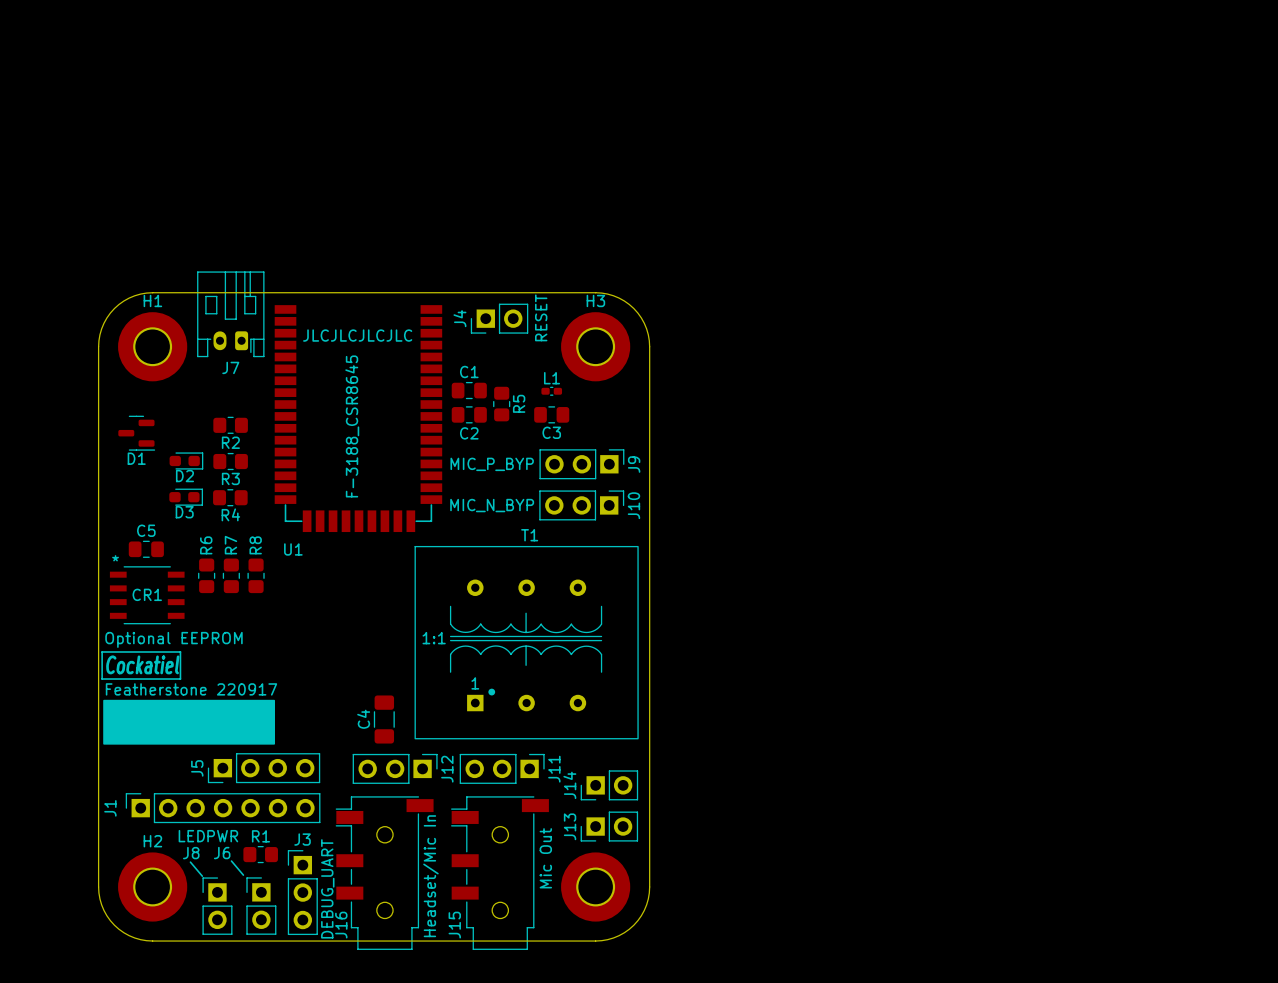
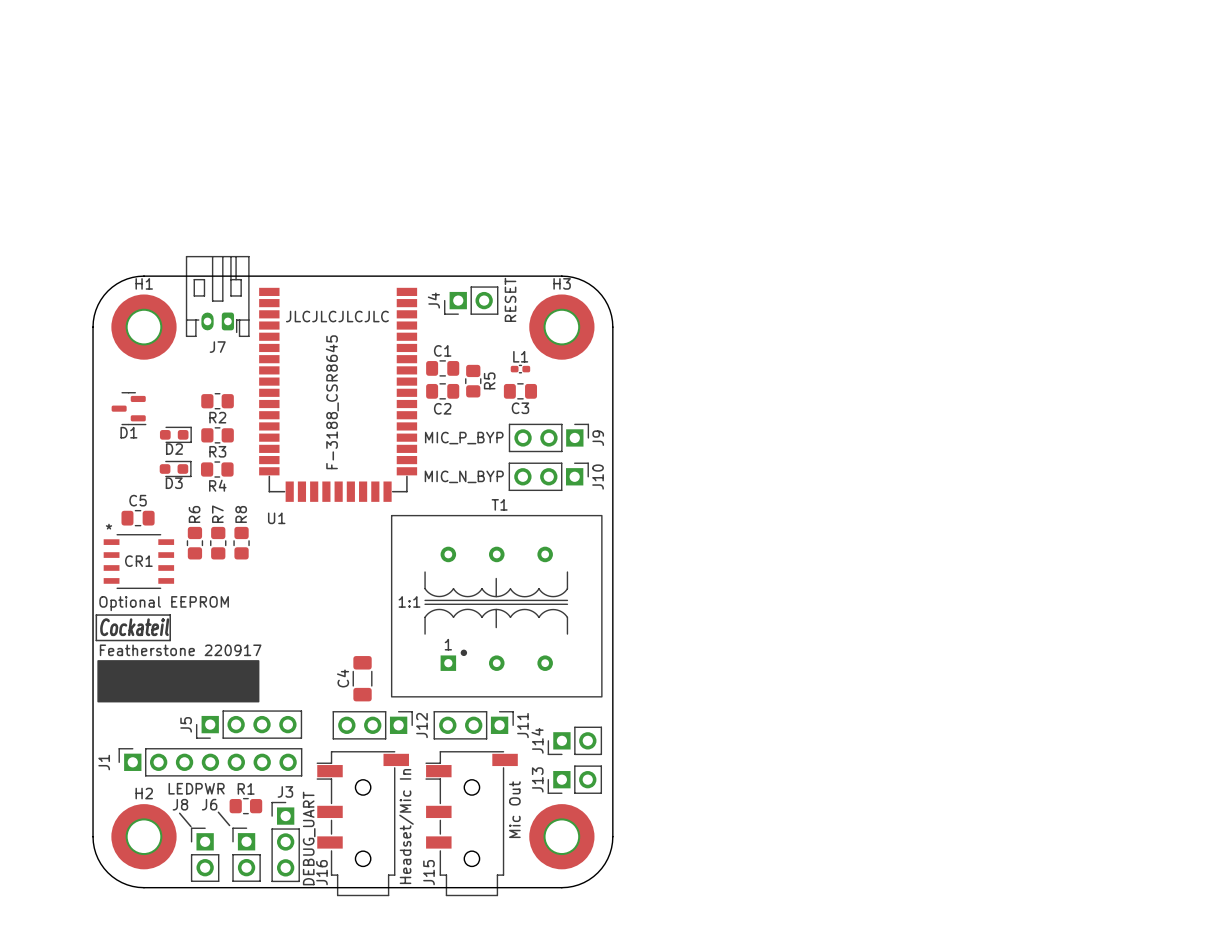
text: Cockatiel (142, 664) -> Cockateil (134, 627)

